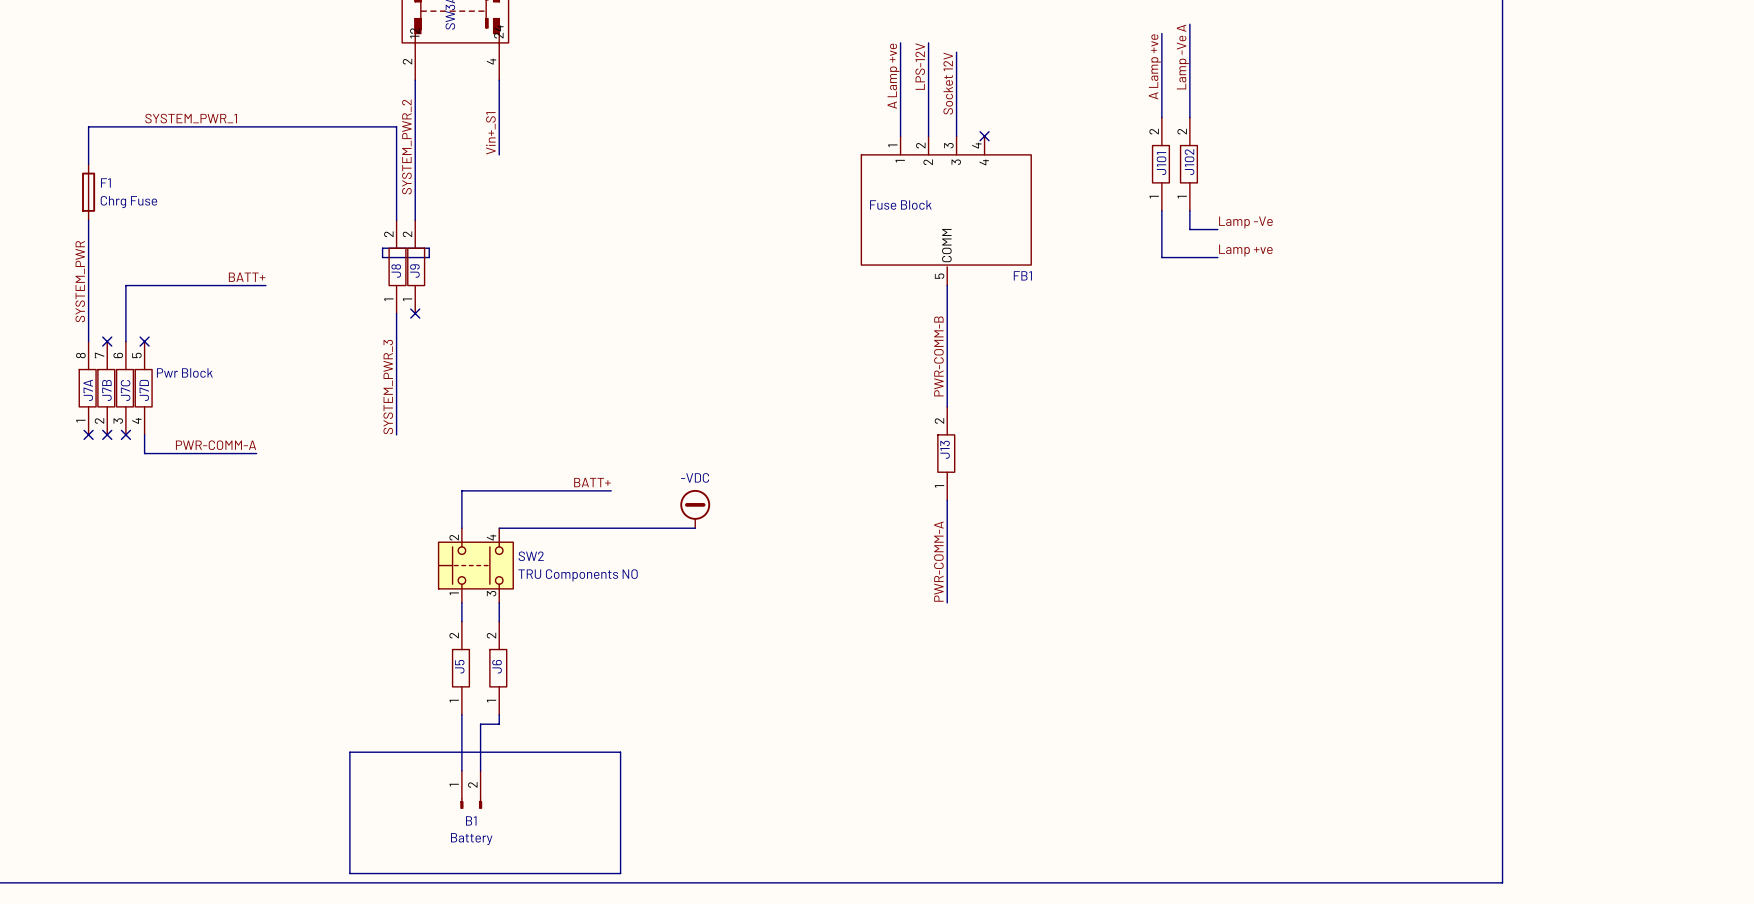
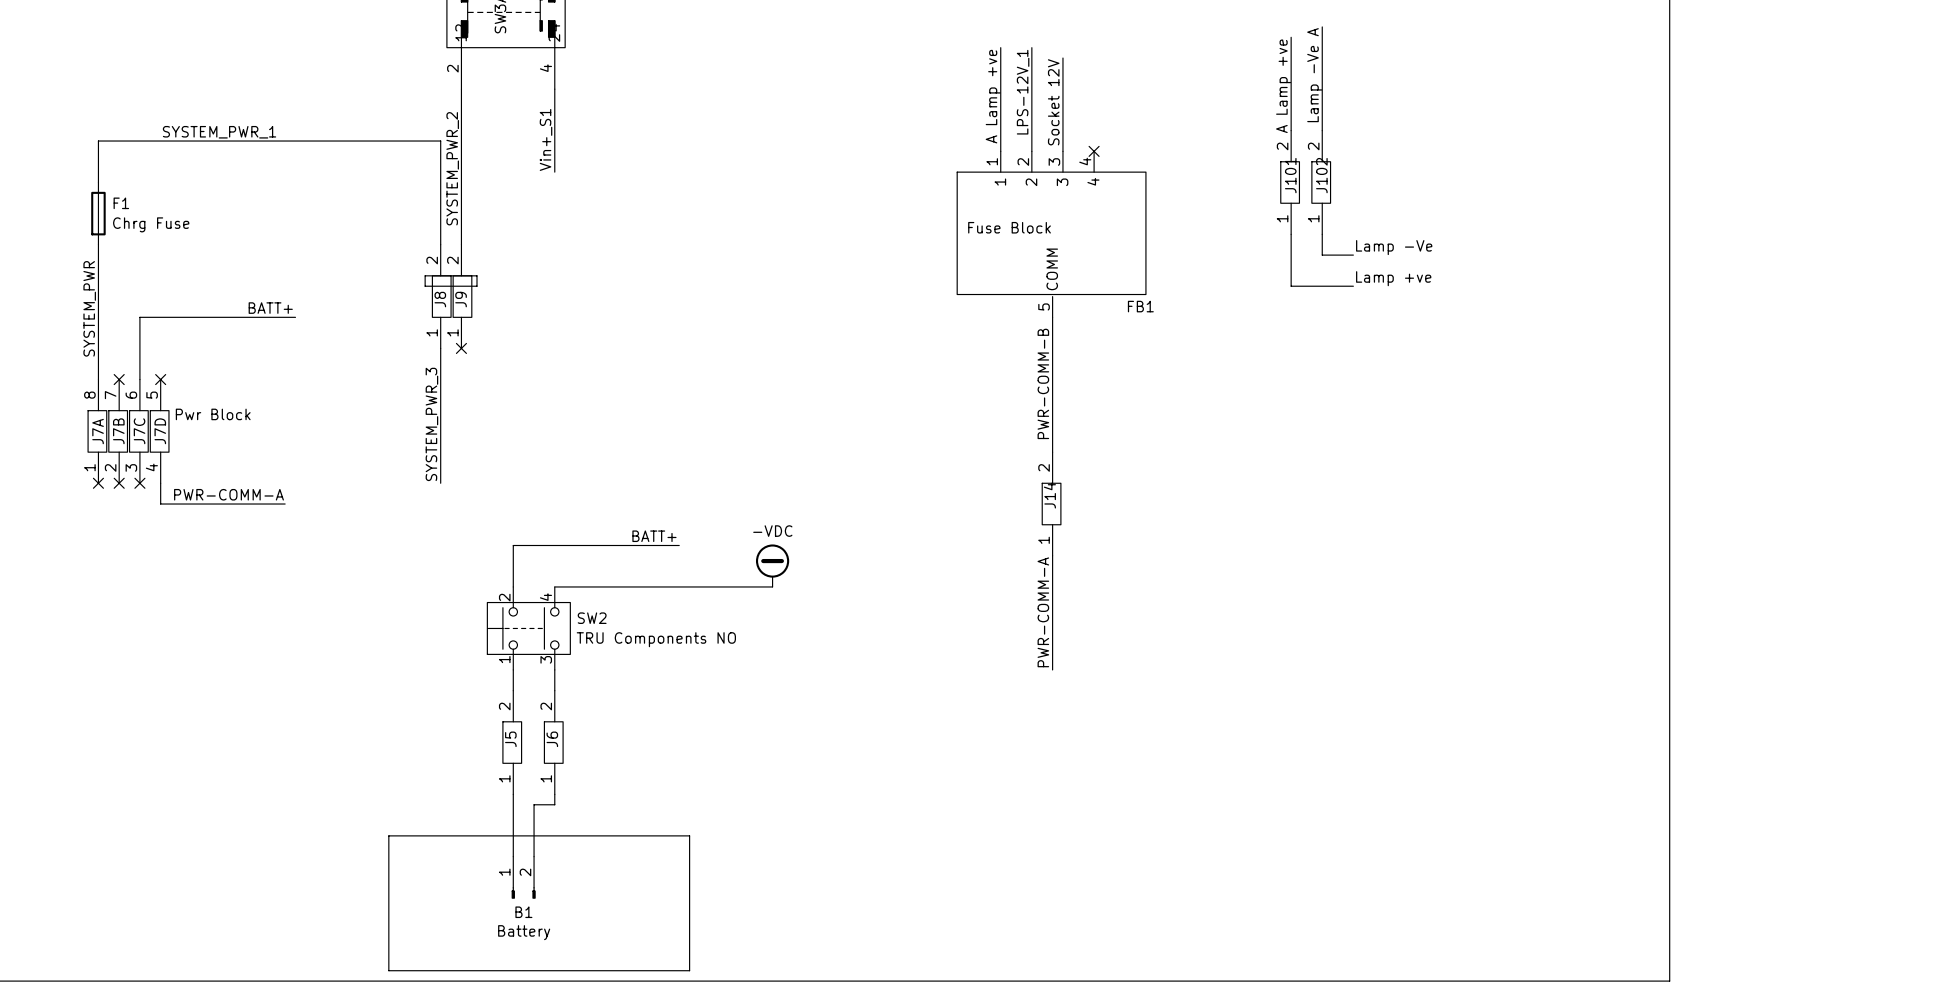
label: LPS-12V (920, 66) -> LPS-12V_1 (1023, 92)
J13 name: J13 (945, 449) -> J14 (1049, 495)

